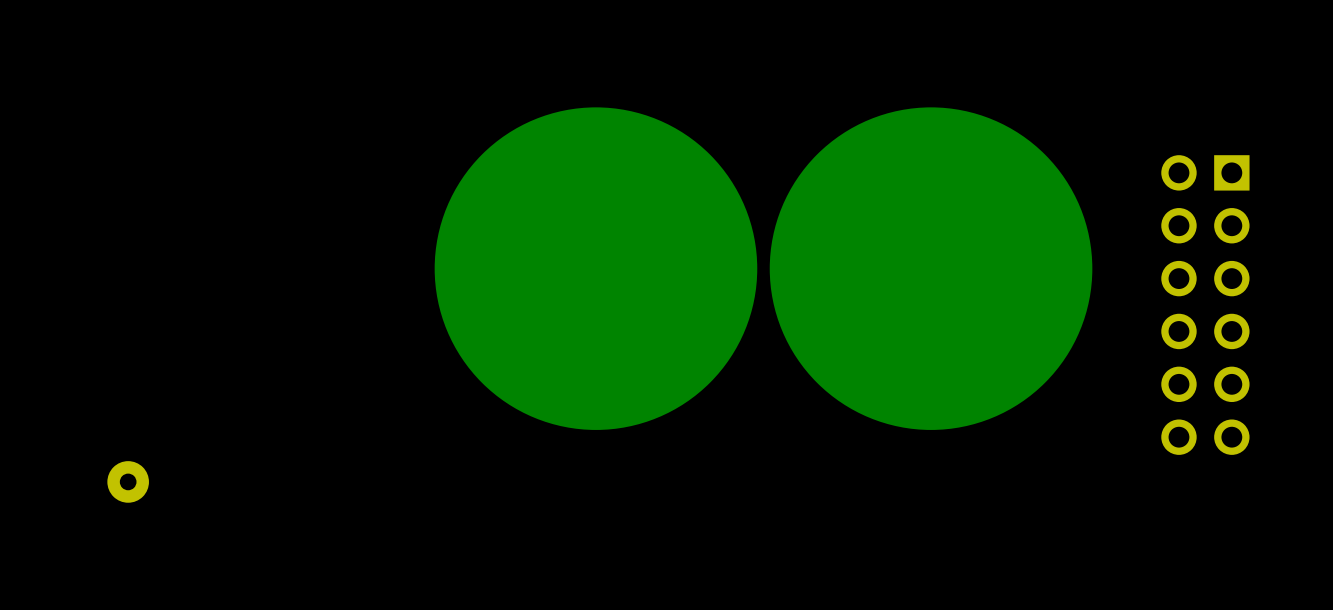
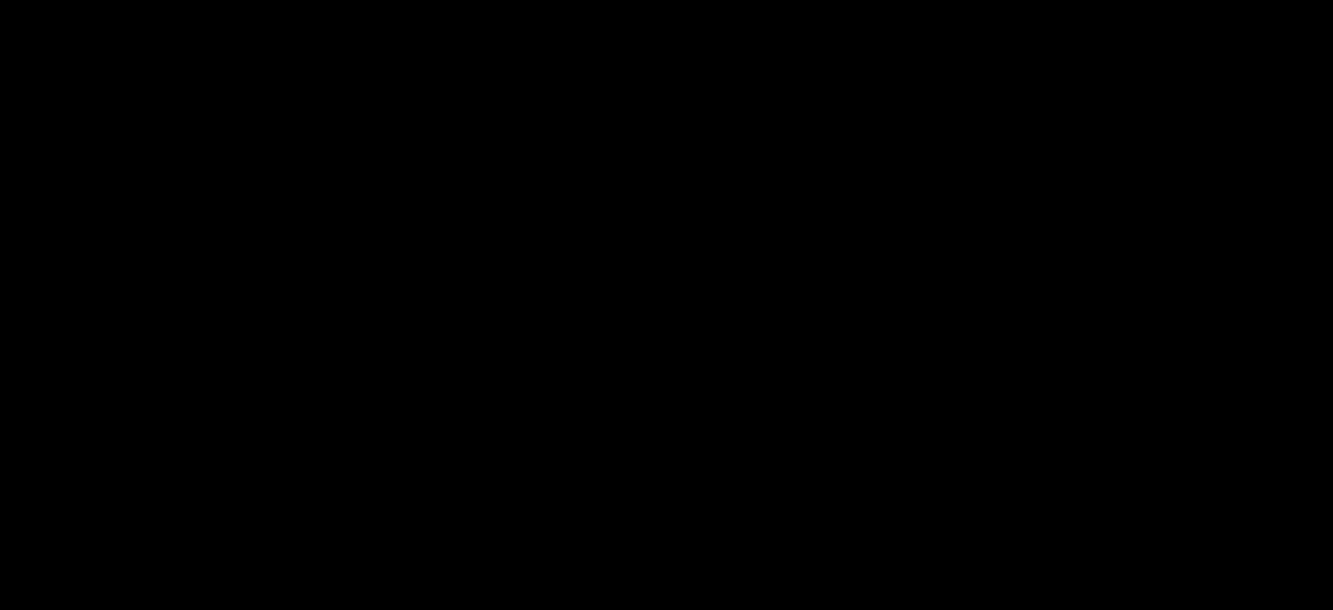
part: (595, 268) -> none
part: (931, 268) -> none
part: (1205, 305) -> none
part: (128, 481) -> none

